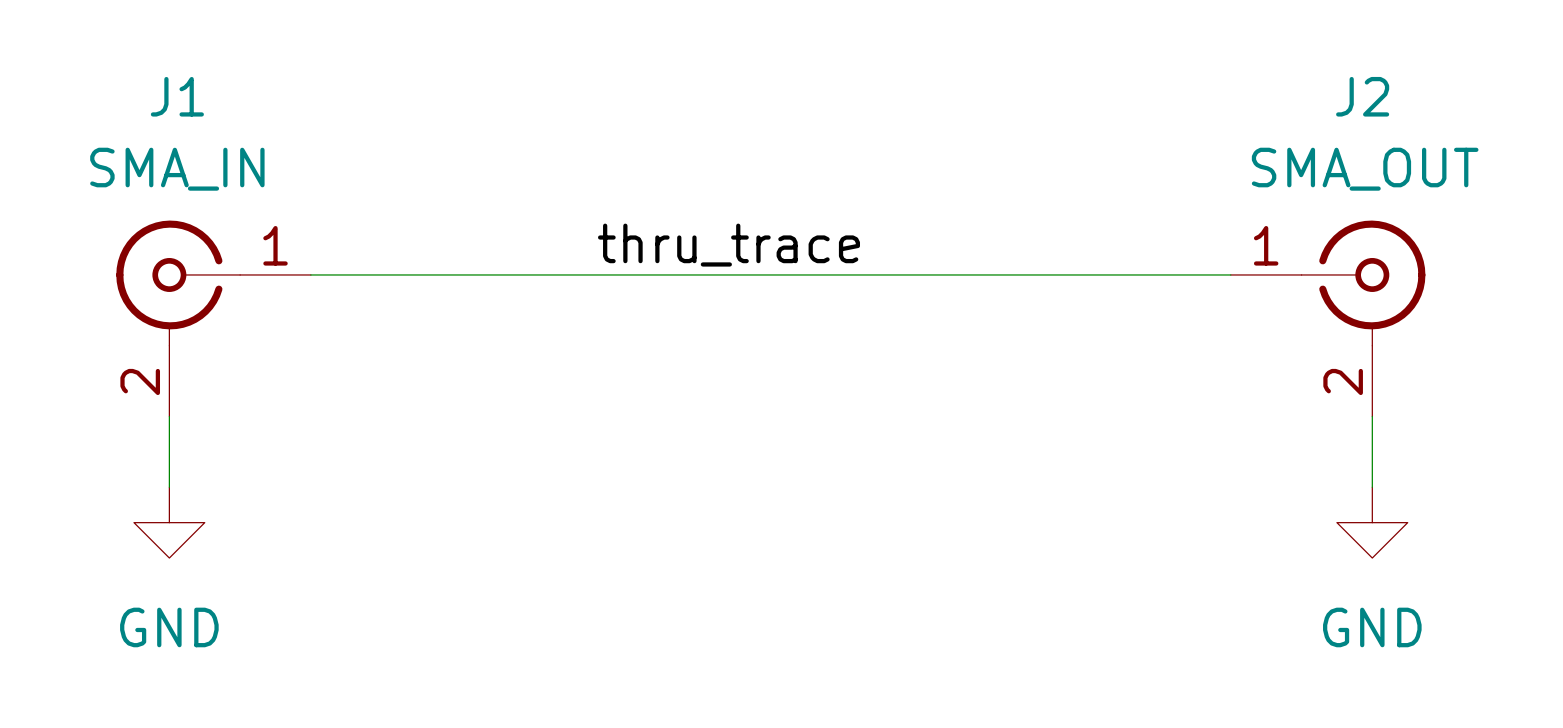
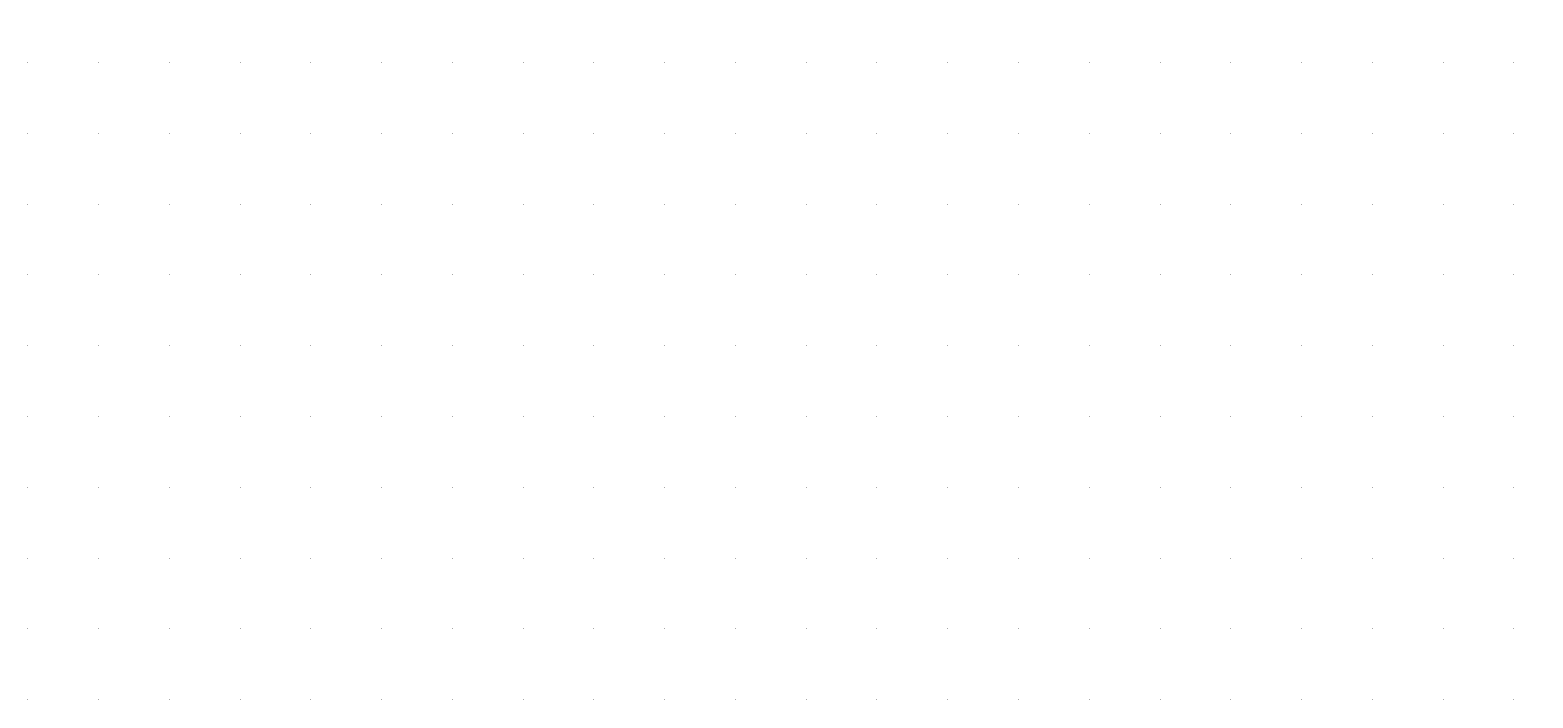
label: thru_trace (728, 245) -> none
wire: (310, 274) (1230, 274) -> none
J1: SMA_IN (213, 318) -> none
J2: SMA_OUT (1328, 318) -> none
wire: (169, 416) (169, 487) -> none
wire: (1372, 416) (1372, 487) -> none
power symbol: GND (169, 522) -> none
power symbol: GND (1372, 522) -> none

